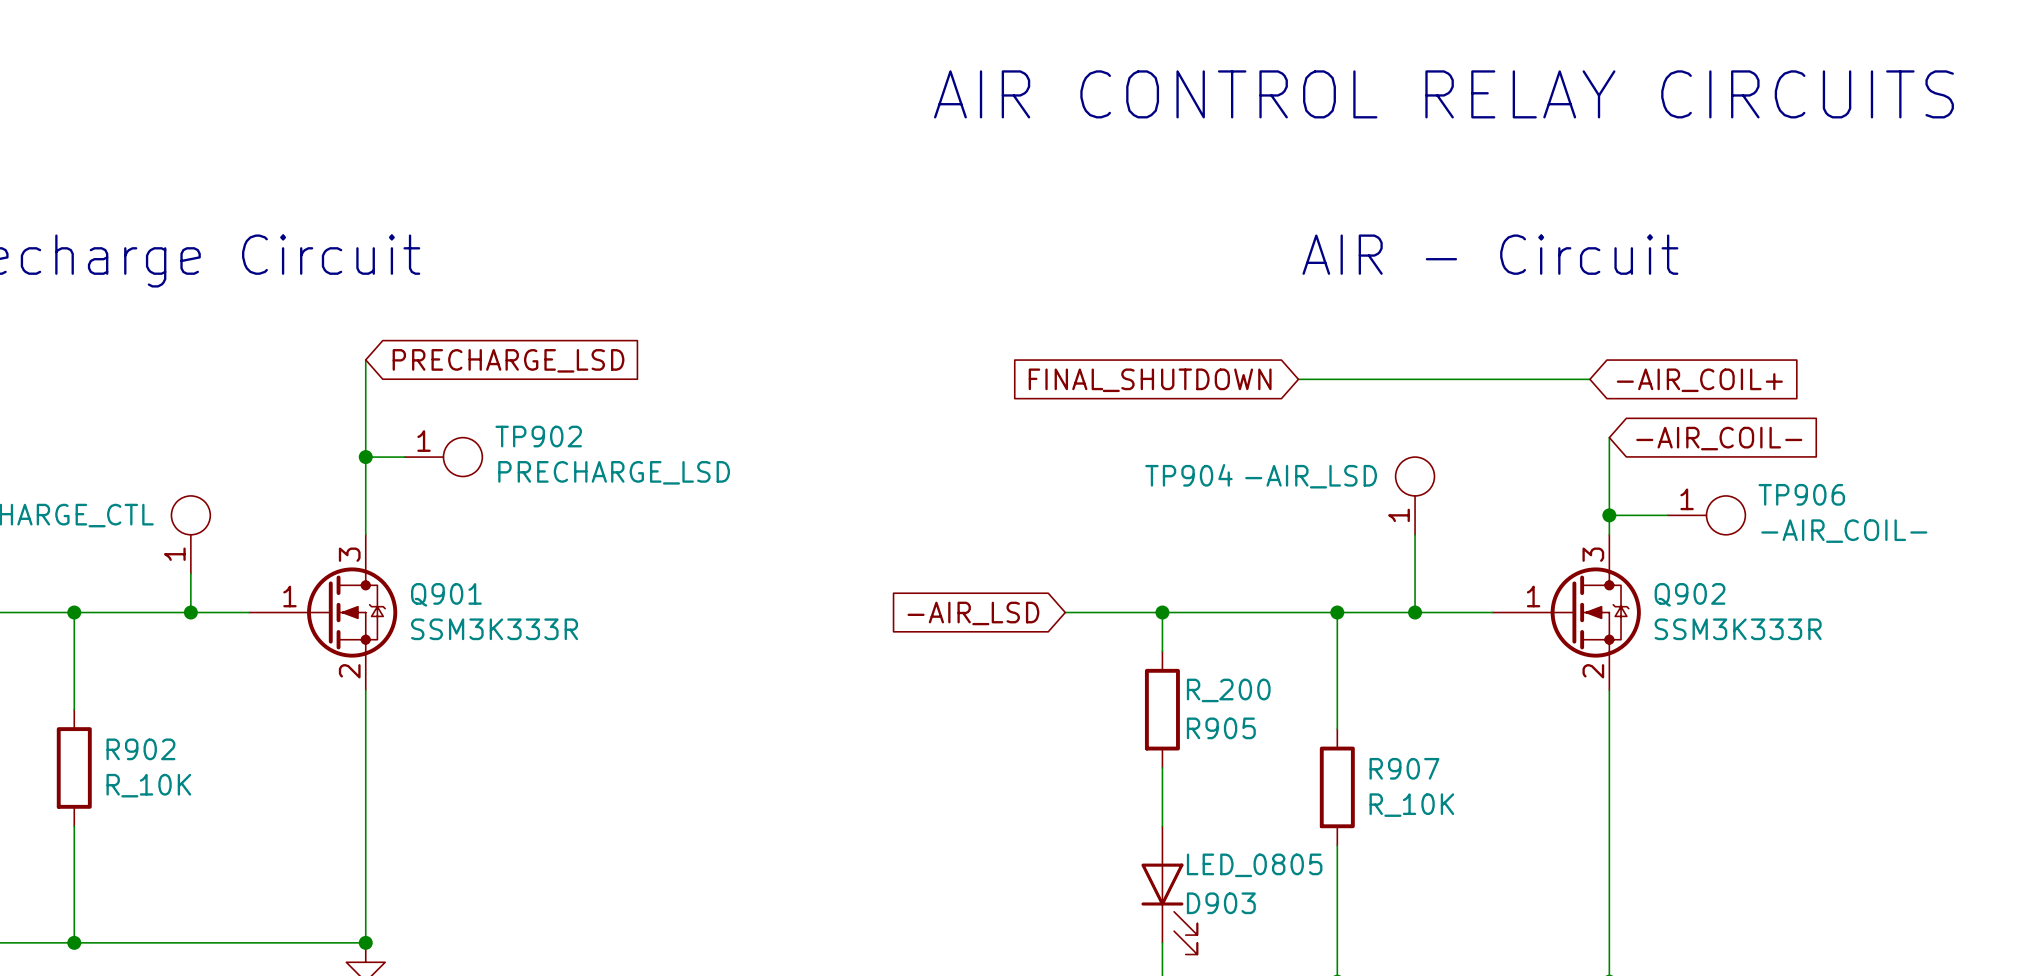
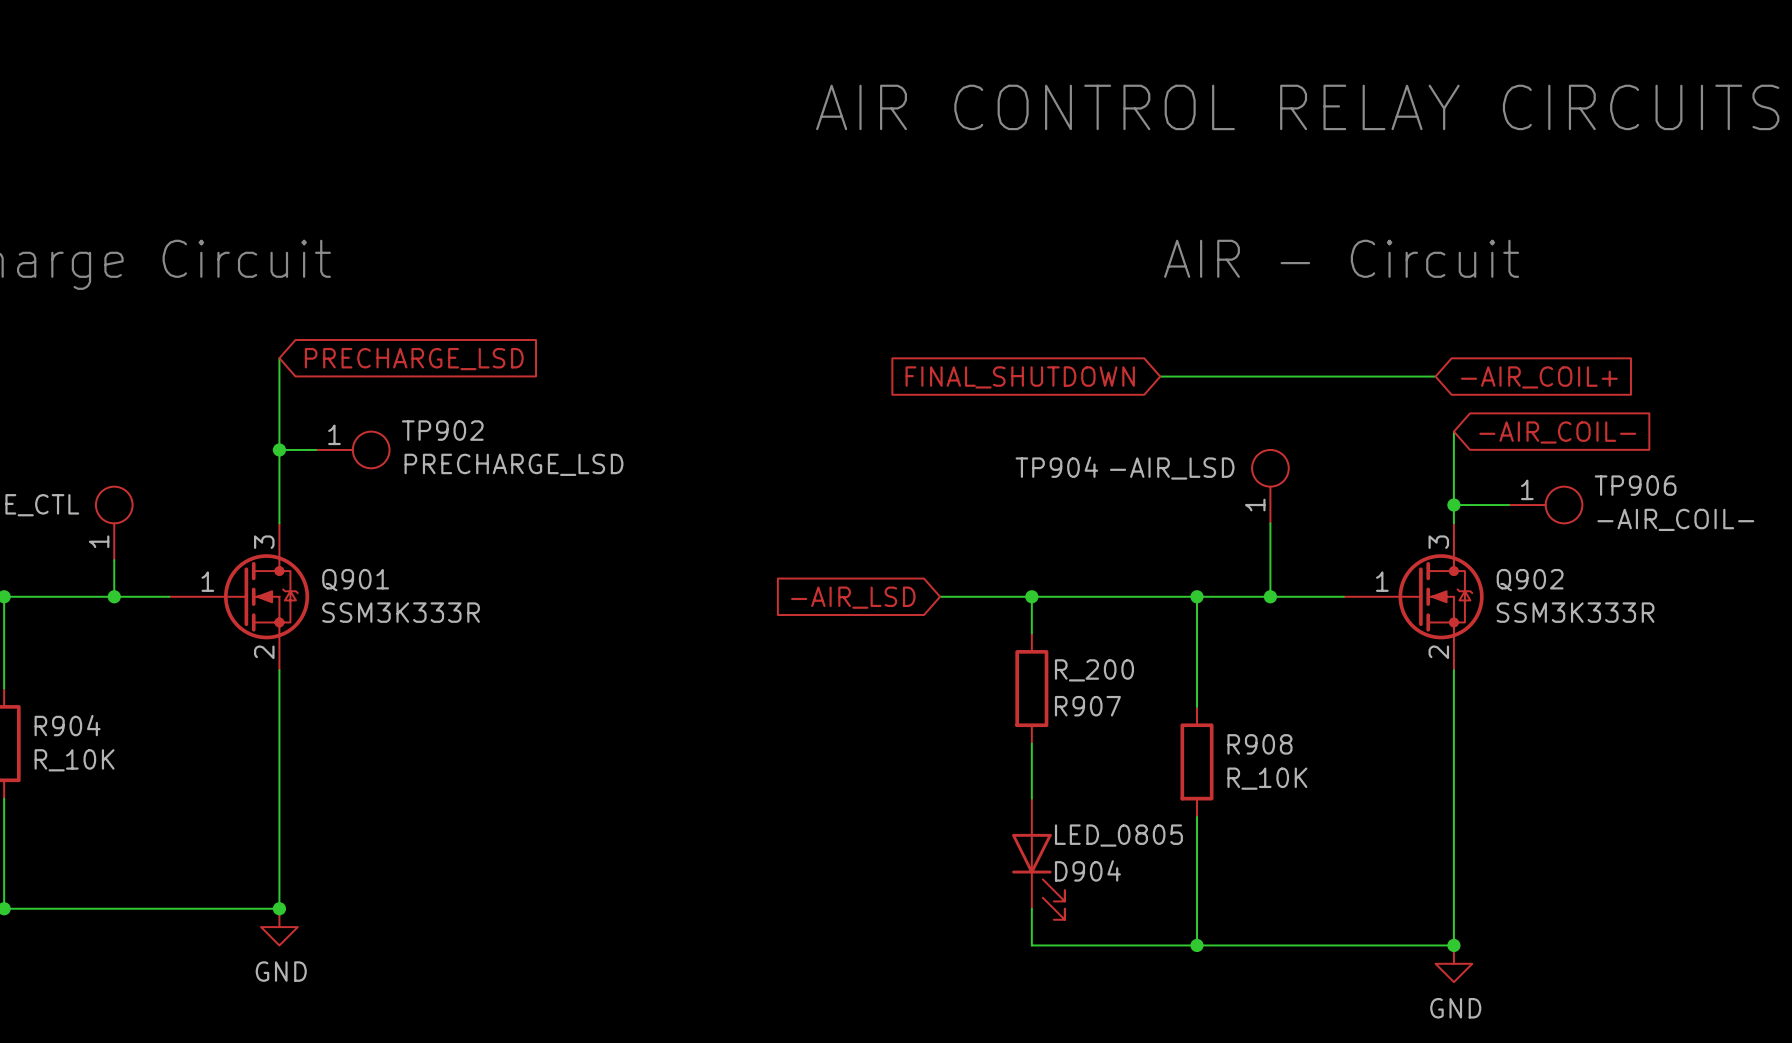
R905 name: R905 (1221, 728) -> R907 (1087, 706)
R902 name: R902 (140, 749) -> R904 (67, 725)
R907 name: R907 (1404, 768) -> R908 (1259, 744)
D903 name: D903 (1221, 903) -> D904 (1087, 870)

